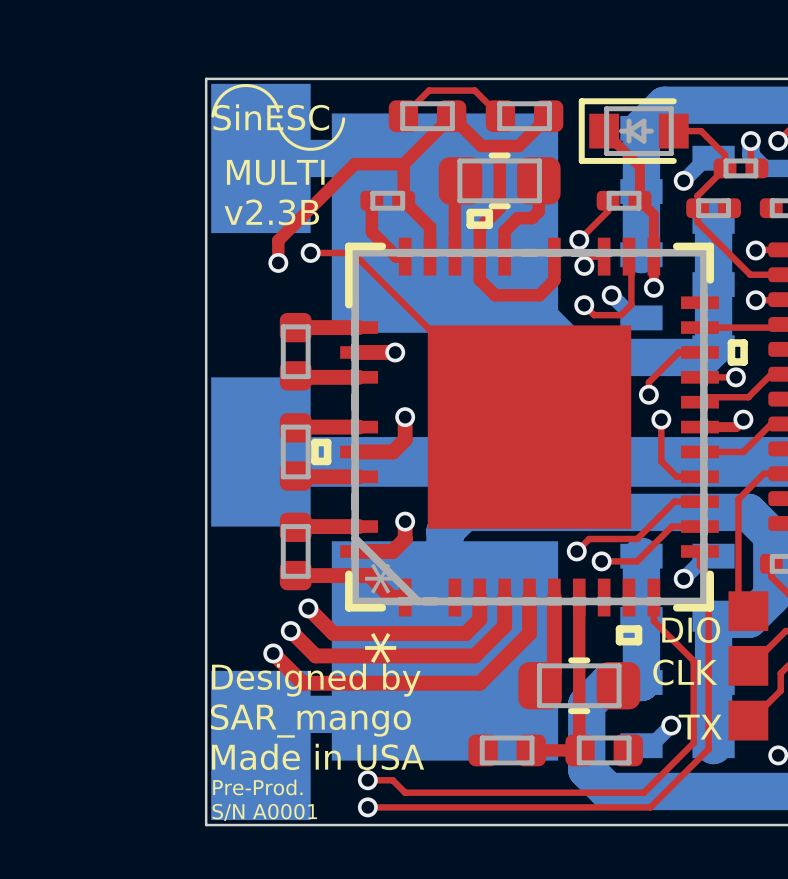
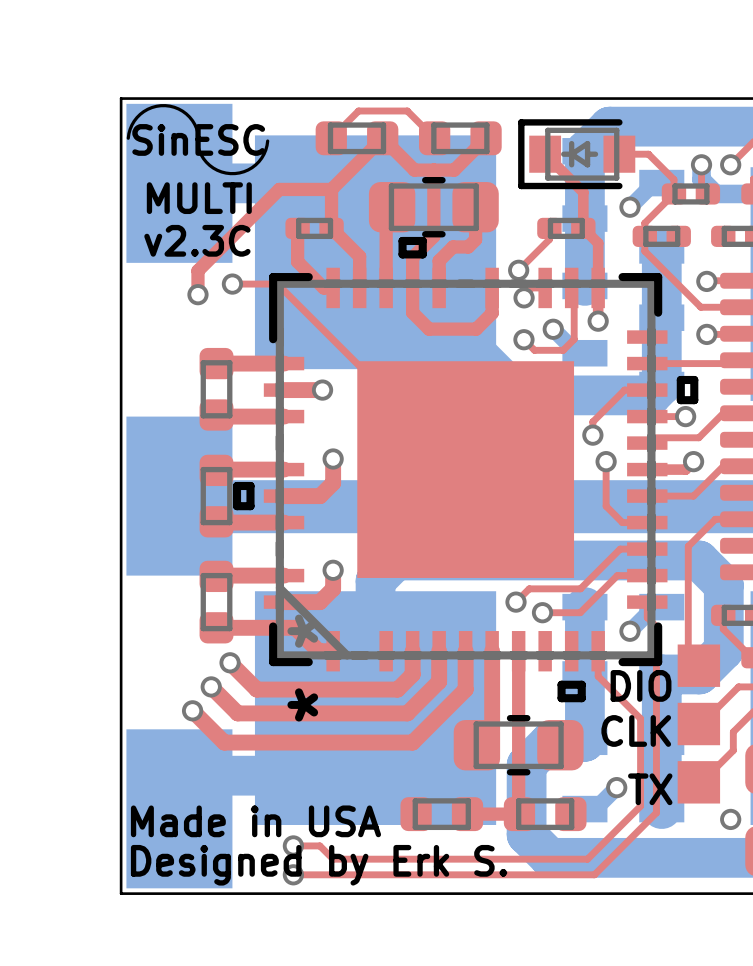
text: v2.3B (271, 212) -> v2.3C (197, 240)
text: Designed by (316, 680) -> none
text: SAR_mango (310, 720) -> none
text: Pre-Prod. (257, 787) -> Designed by Erk S. (319, 865)
text: S/N A0001 (264, 812) -> none

